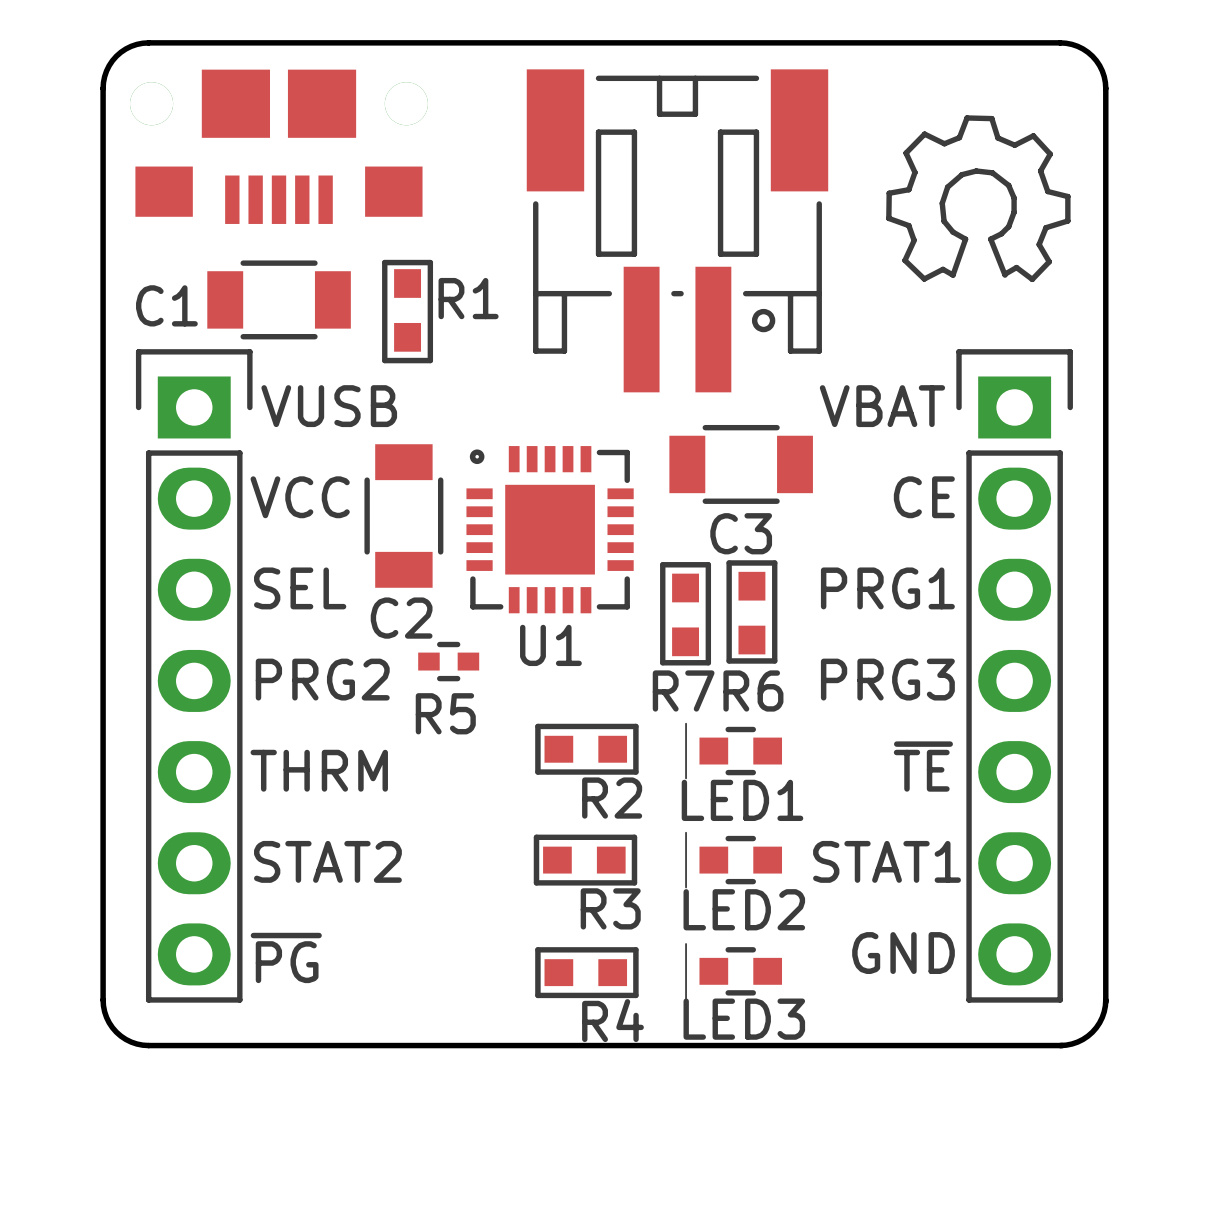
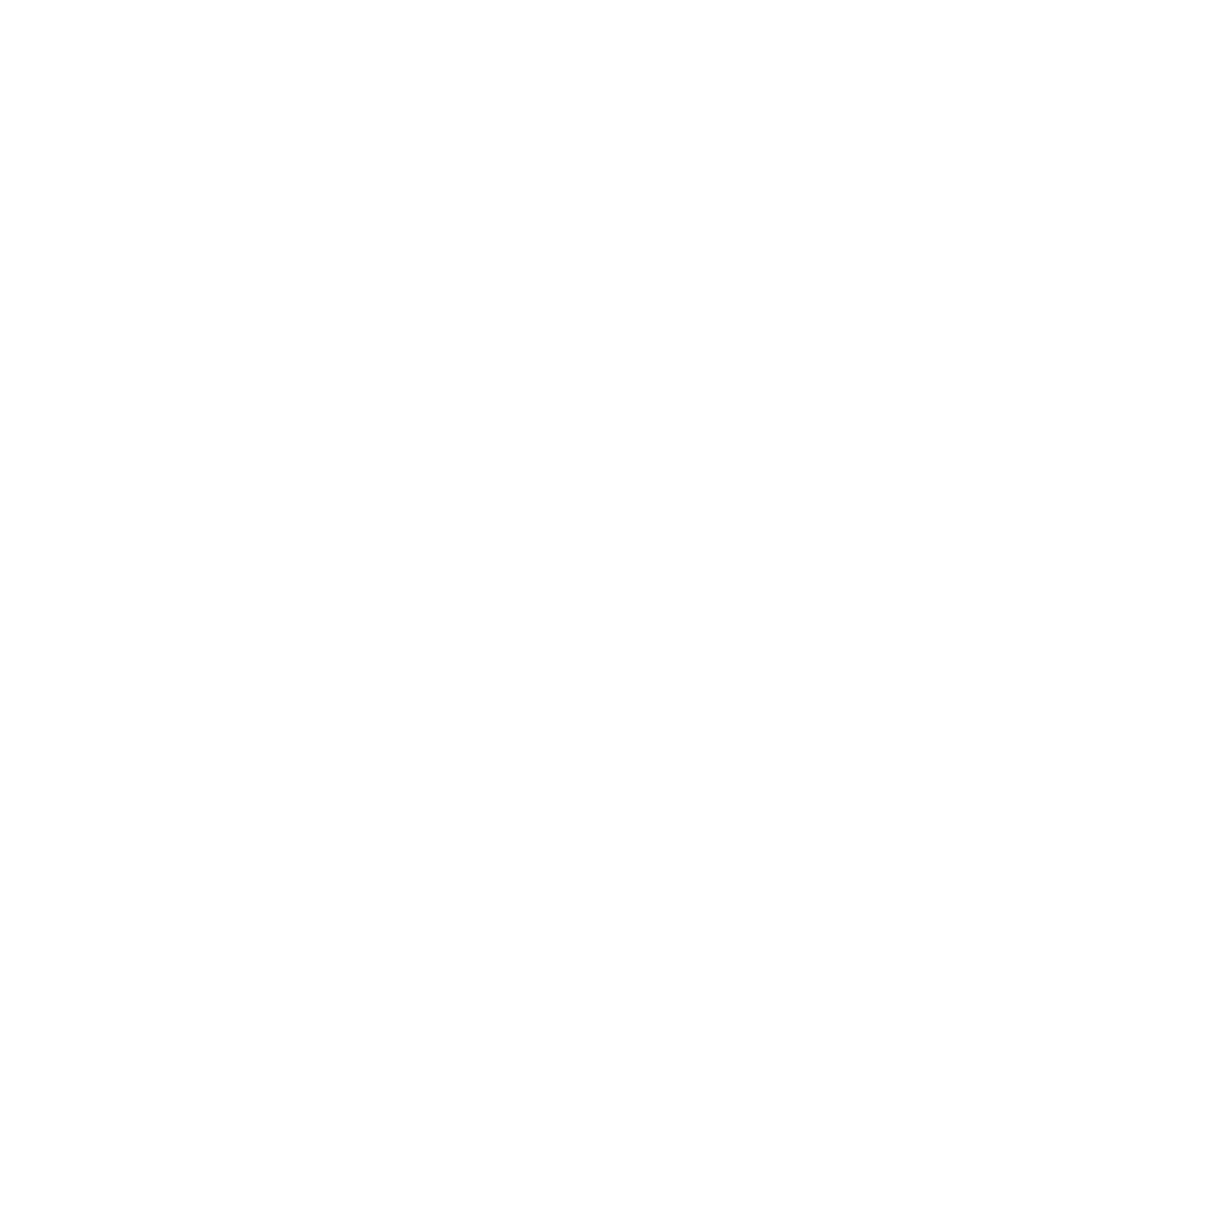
drawing: [886, 115, 1071, 283] -> none
part: (278, 146) -> none
part: (677, 230) -> none
C1: (279, 299) -> none
R1: (407, 311) -> none
text: VUSB (329, 406) -> none
text: VBAT (882, 406) -> none
C3: (741, 464) -> none
text: VCC (300, 497) -> none
text: CE (924, 497) -> none
C2: (403, 516) -> none
U1: (550, 529) -> none
text: SEL (300, 588) -> none
text: PRG1 (887, 588) -> none
R6: (751, 611) -> none
R7: (685, 613) -> none
R5: (448, 661) -> none
part: (194, 675) -> none
part: (1014, 675) -> none
text: PRG2 (322, 679) -> none
text: PRG3 (887, 679) -> none
R2: (586, 749) -> none
LED1: (733, 751) -> none
text: ~{TE} (923, 766) -> none
text: THRM (319, 770) -> none
R3: (585, 860) -> none
LED2: (733, 860) -> none
text: STAT2 (327, 861) -> none
text: STAT1 (887, 861) -> none
text: GND (903, 953) -> none
text: ~{PG} (286, 957) -> none
LED3: (733, 971) -> none
R4: (586, 972) -> none
board edge: (1105, 999) (1102, 1017) (1092, 1032) (1077, 1042) (1060, 1045) -> none
board edge: (1105, 1002) (1105, 88) (1102, 71) (1092, 56) (1077, 46) (1060, 42) (148, 42) (131, 46) (116, 56) (106, 71) (103, 88) (103, 999) (106, 1017) (116, 1032) (131, 1042) (148, 1045) (1062, 1045) -> none

